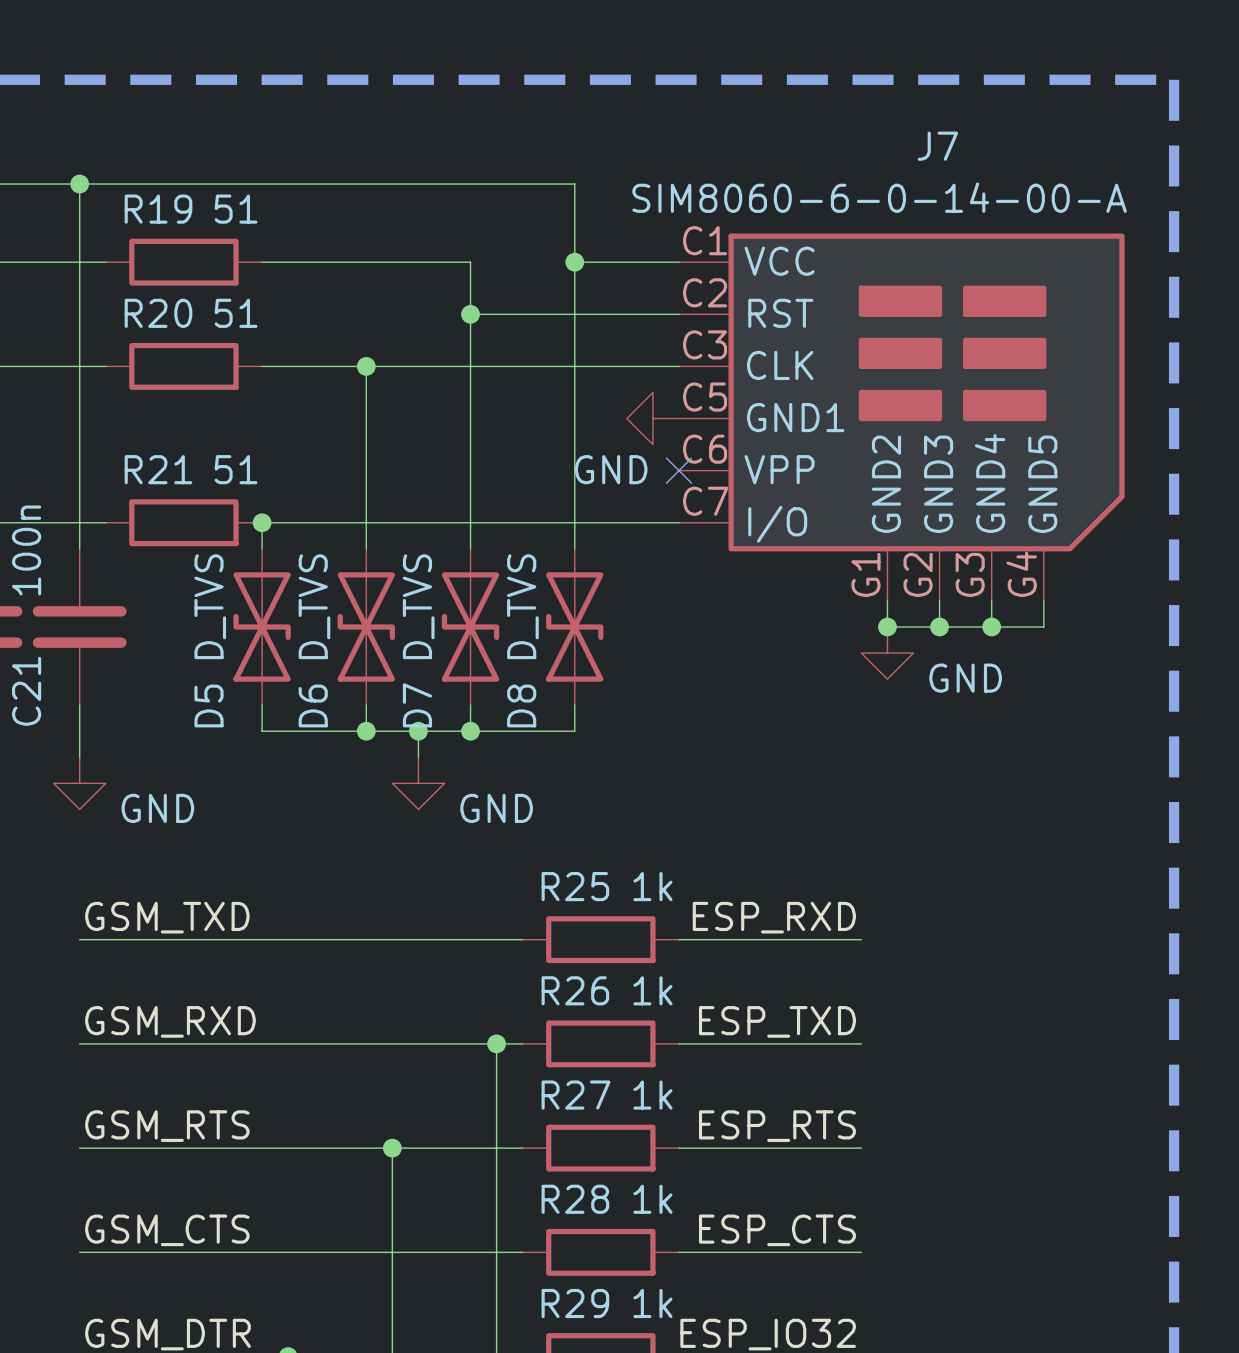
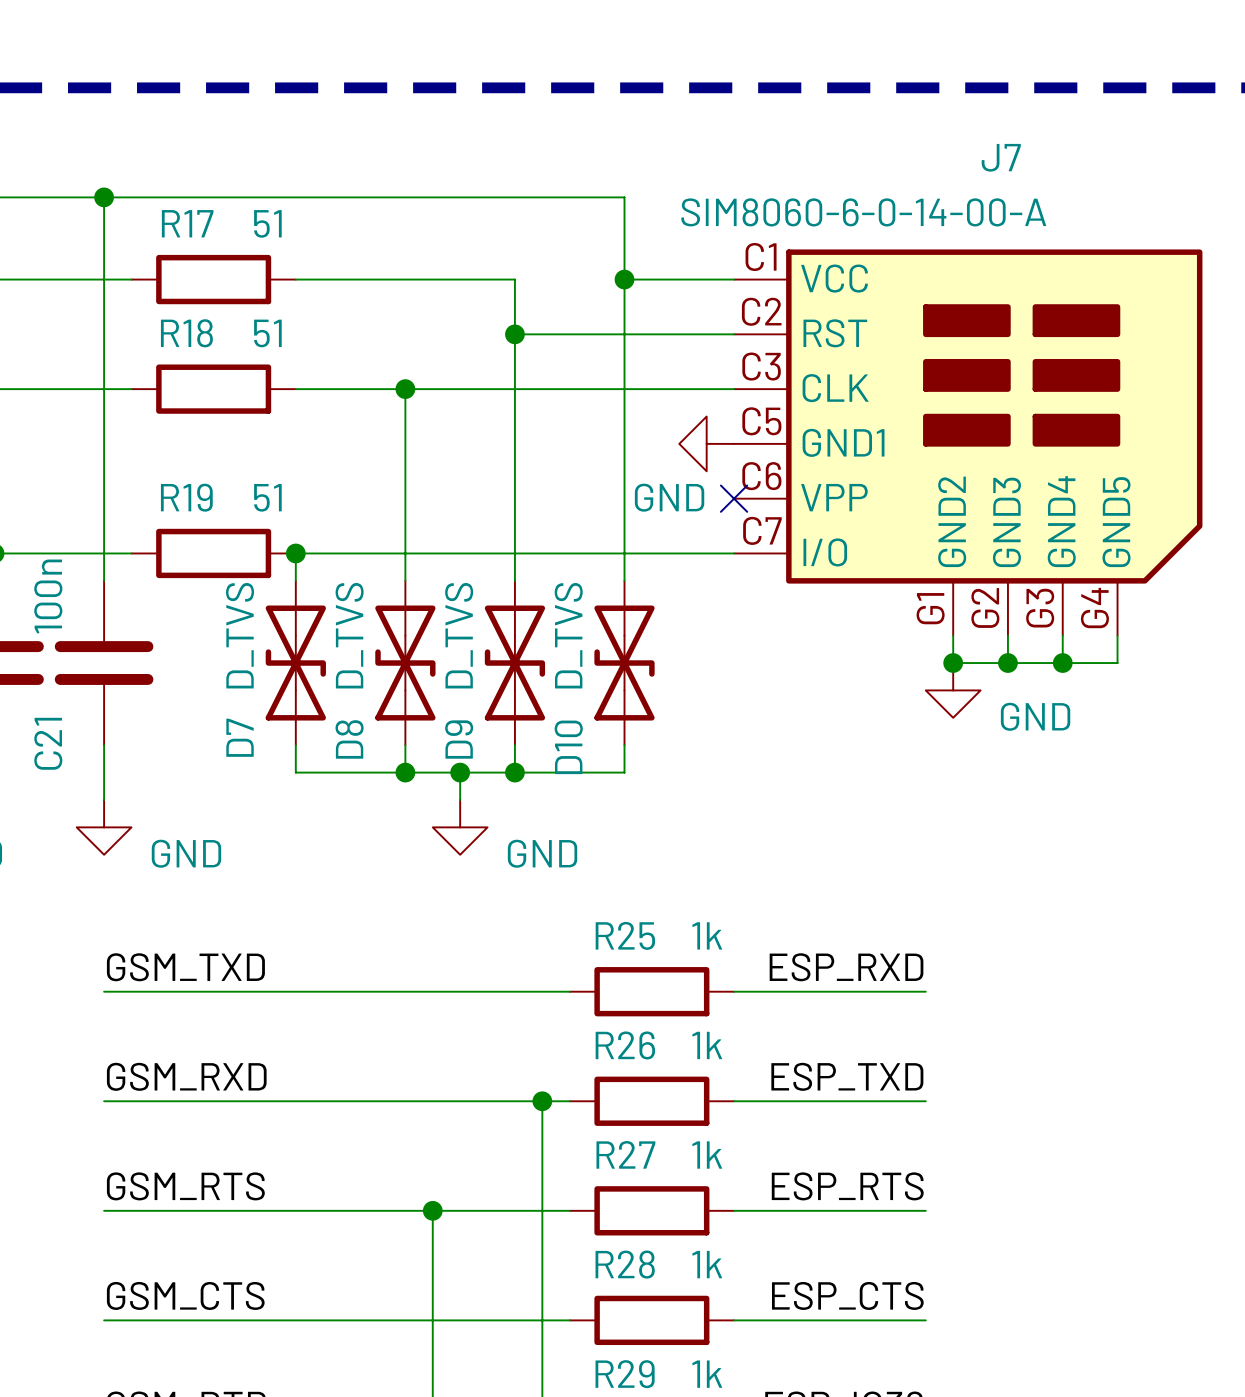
R19 name: R19 (158, 209) -> R17 (187, 223)
R20 name: R20 (158, 313) -> R18 (186, 333)
R21 name: R21 (158, 469) -> R19 (186, 497)
D5 name: D5 (209, 705) -> D7 (240, 737)
D6 name: D6 (313, 705) -> D8 (349, 739)
D7 name: D7 (417, 705) -> D9 (459, 739)
D8 name: D8 (521, 705) -> D10 (568, 747)

